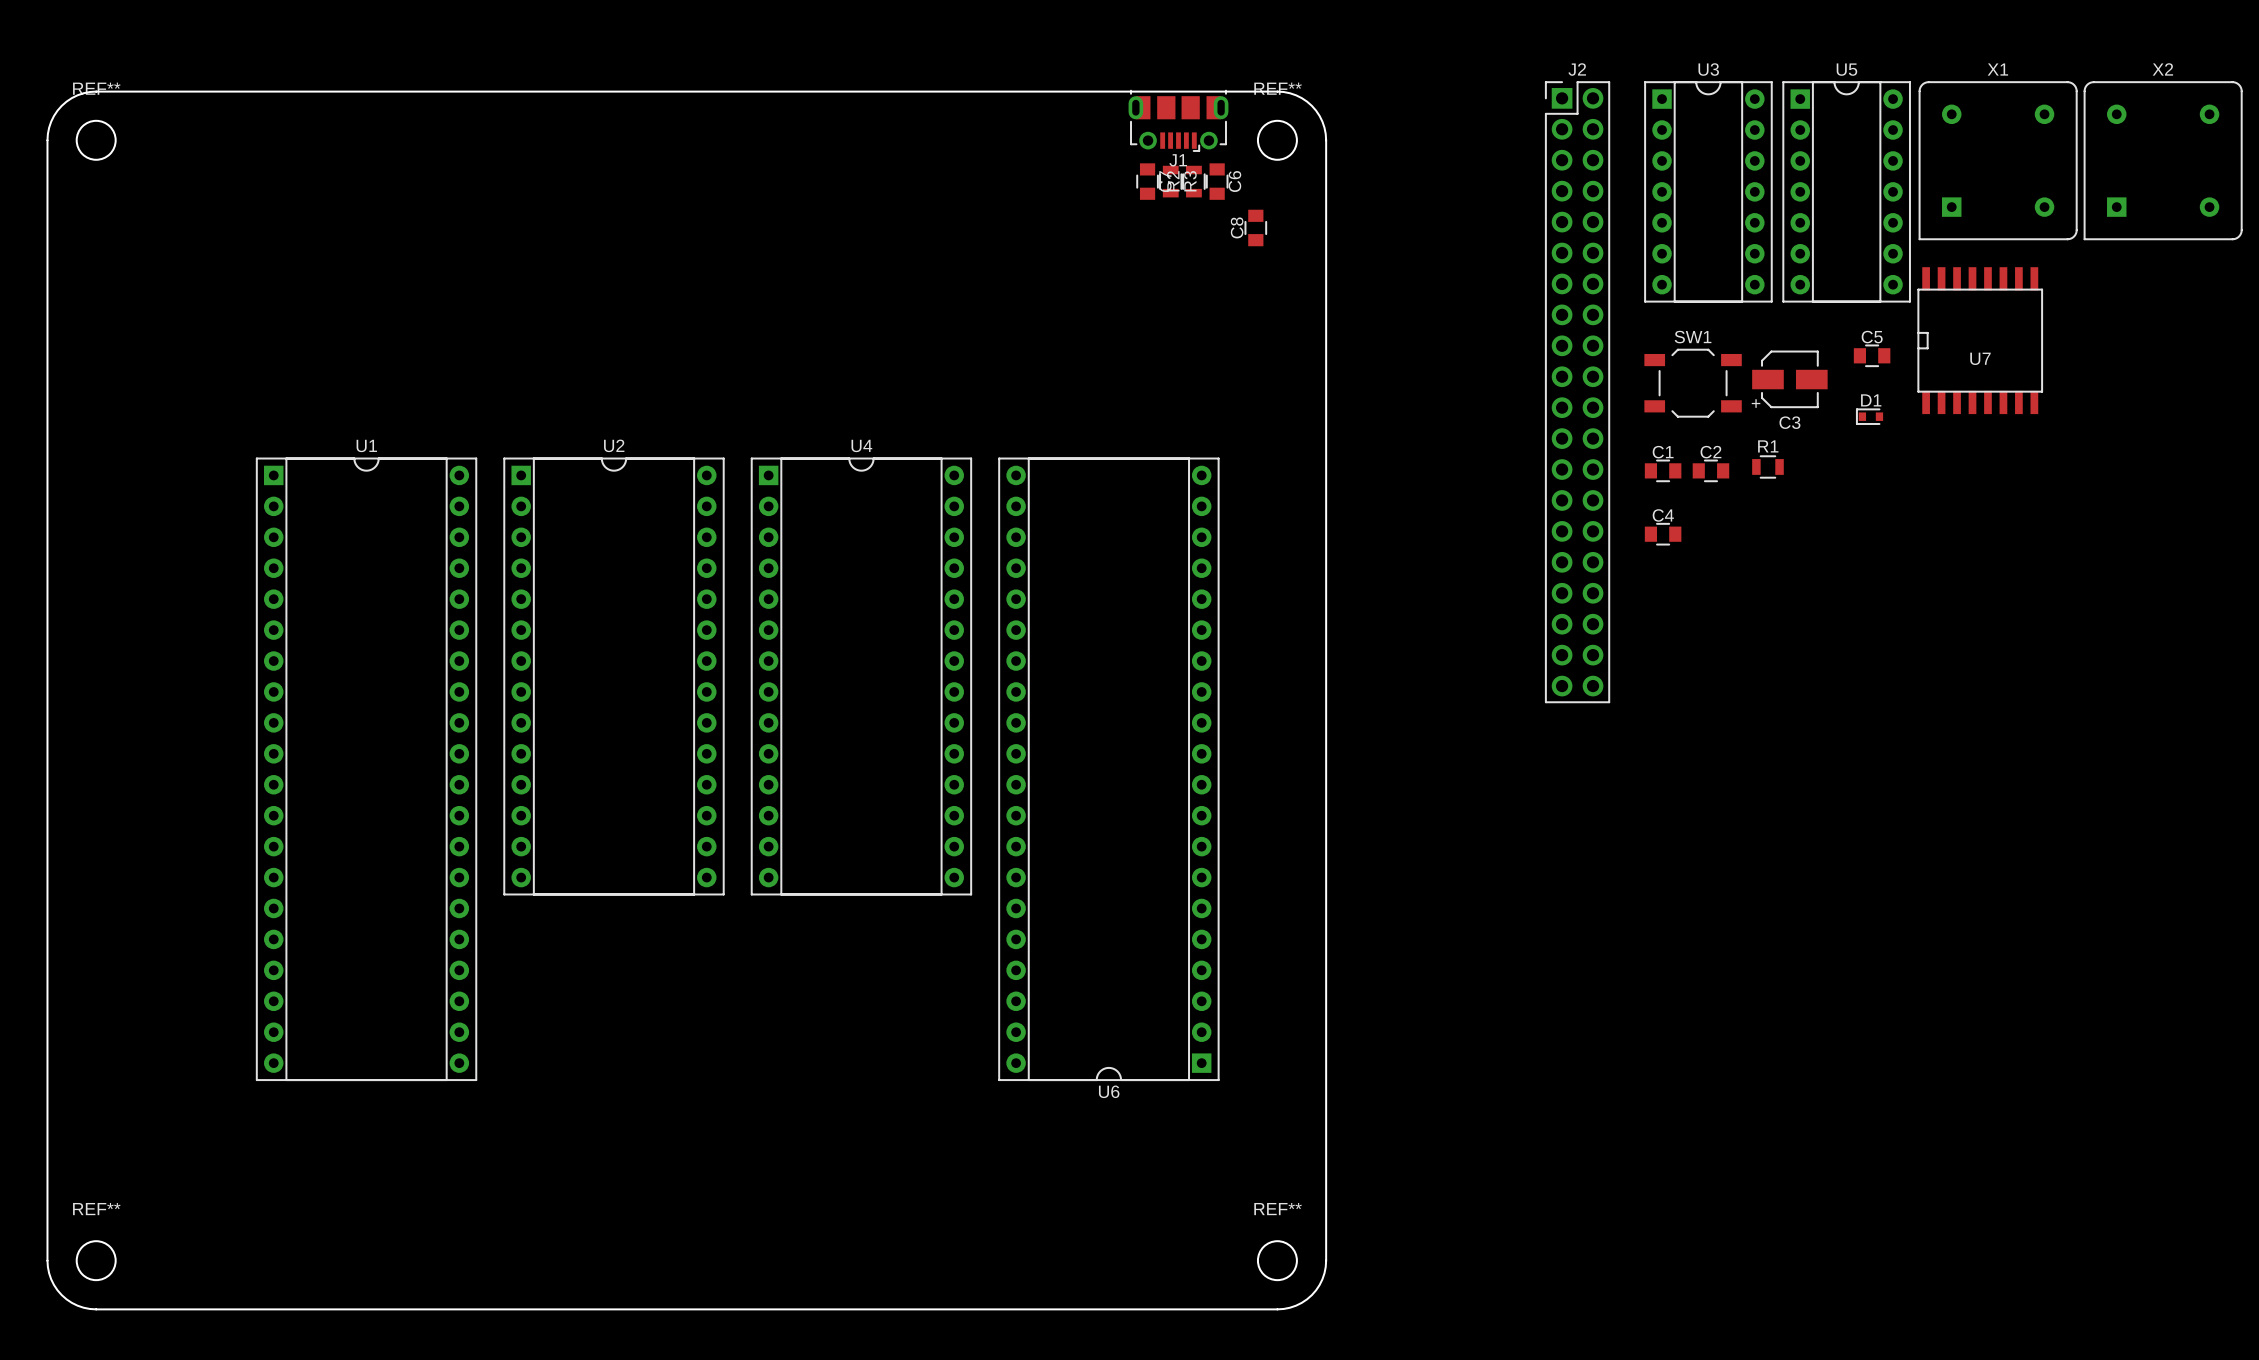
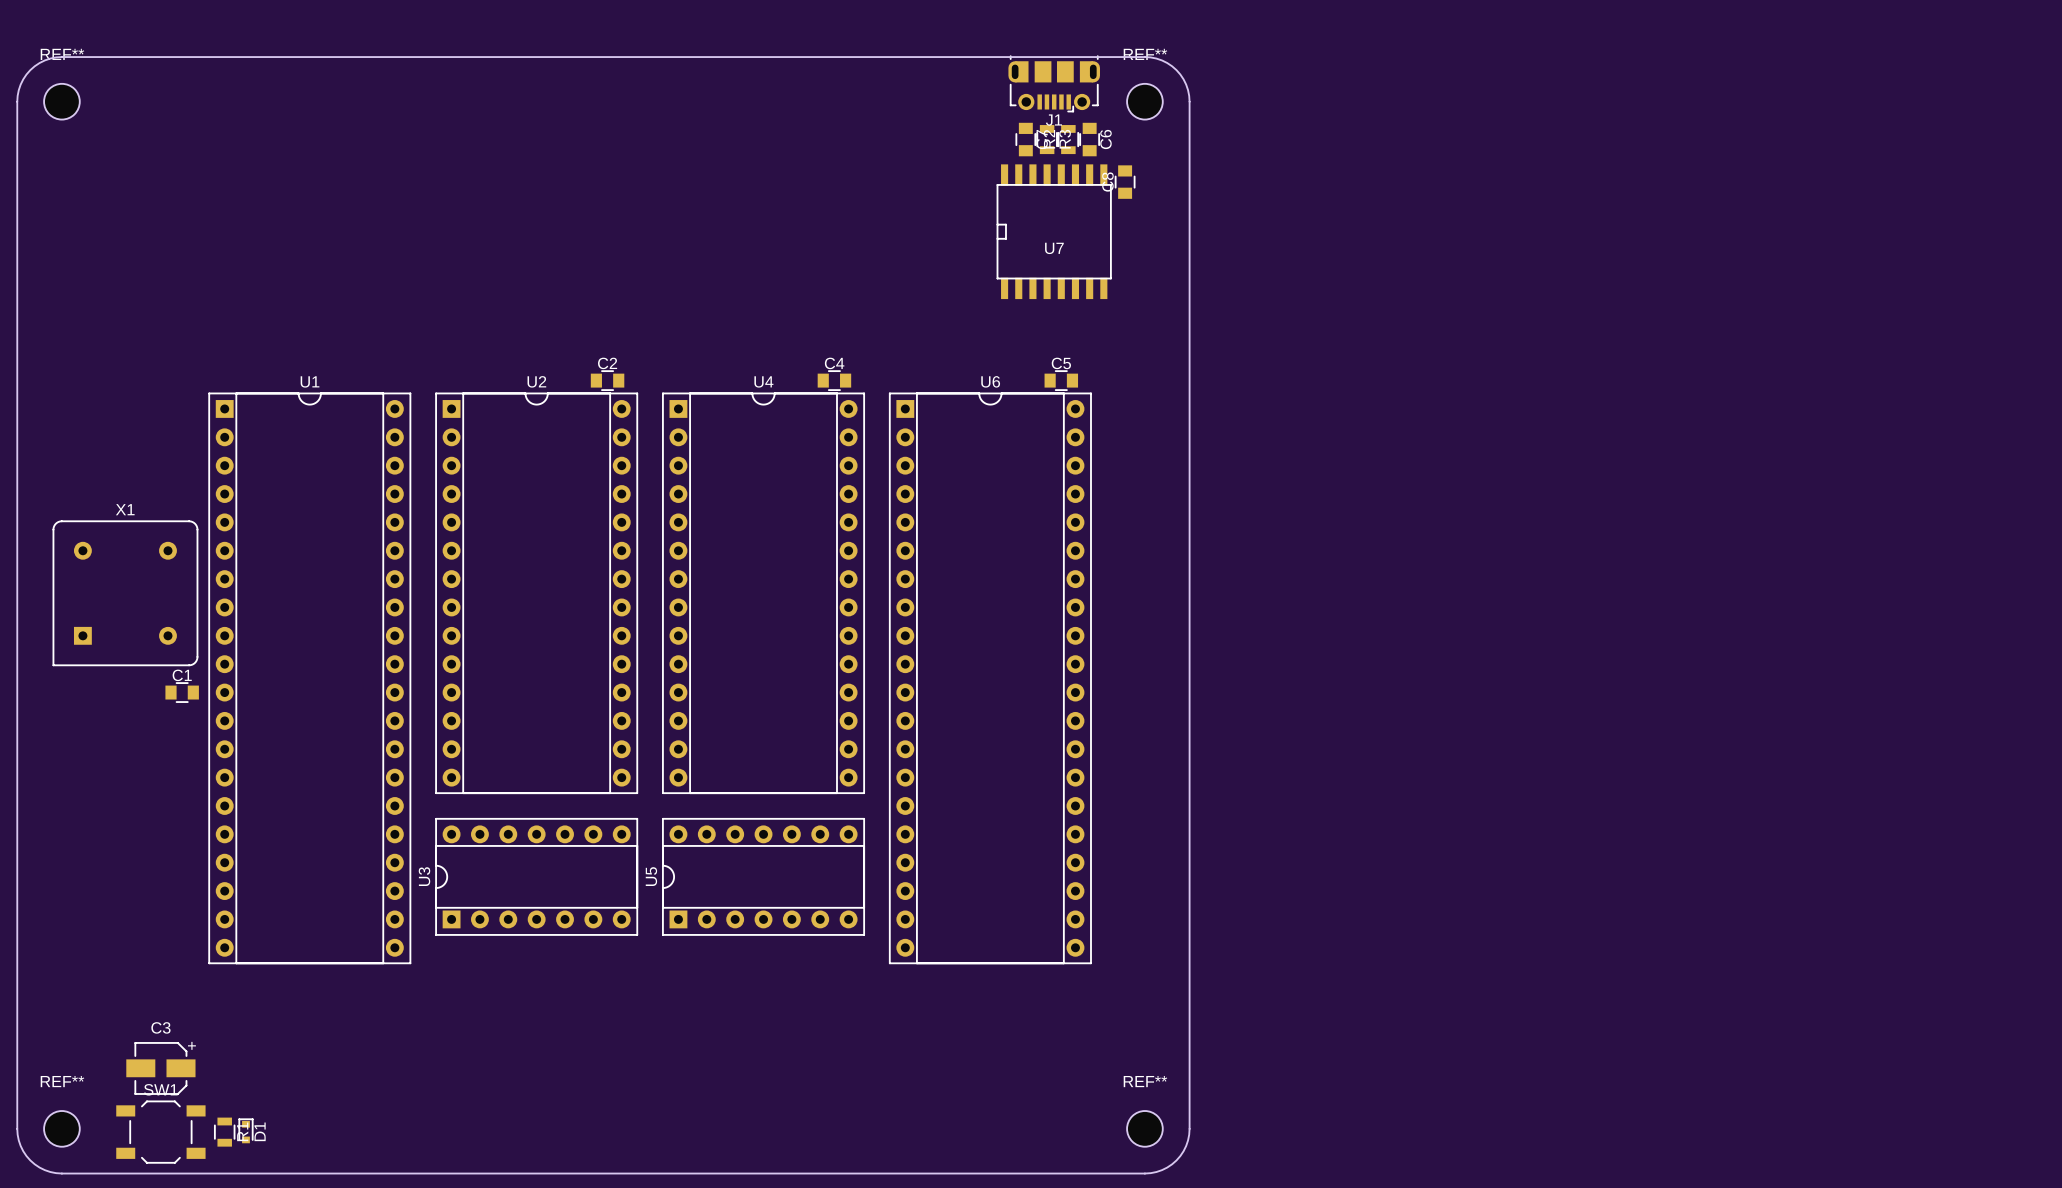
X1 position: (1998, 160) -> (125, 593)
X2: (2163, 160) -> none
U3 rotation: 0° (1708, 191) -> 90° counterclockwise (536, 876)
U3 position: (1708, 191) -> (536, 876)
U5 rotation: 0° (1846, 191) -> 90° counterclockwise (763, 876)
U5 position: (1846, 191) -> (763, 876)
U7 position: (1980, 340) -> (1054, 231)
C5 position: (1872, 355) -> (1061, 380)
C3 rotation: 0° (1789, 379) -> 180° (160, 1068)
C3 position: (1789, 379) -> (160, 1068)
SW1 position: (1693, 383) -> (160, 1132)
J2: (1577, 392) -> none
D1 rotation: 0° (1869, 416) -> 90° clockwise (245, 1130)
D1 position: (1869, 416) -> (245, 1130)
R1 rotation: 0° (1767, 466) -> 90° clockwise (224, 1132)
R1 position: (1767, 466) -> (224, 1132)
C1 position: (1663, 470) -> (182, 692)
C2 position: (1710, 470) -> (607, 380)
C4 position: (1663, 534) -> (834, 380)
U6 rotation: 0° (1108, 769) -> 180° (990, 678)

